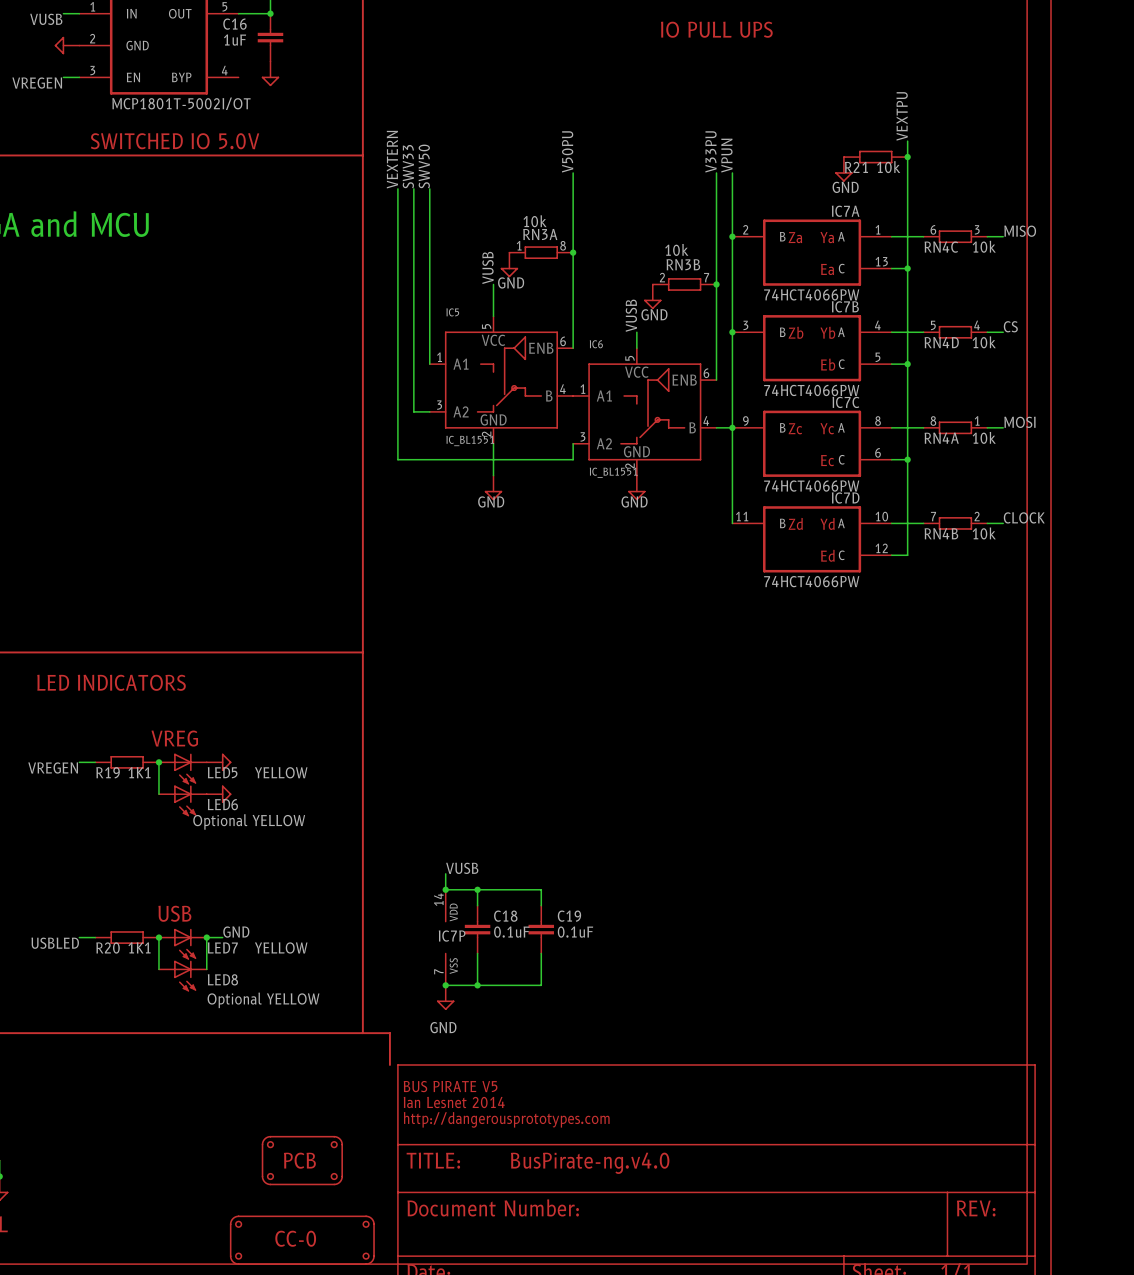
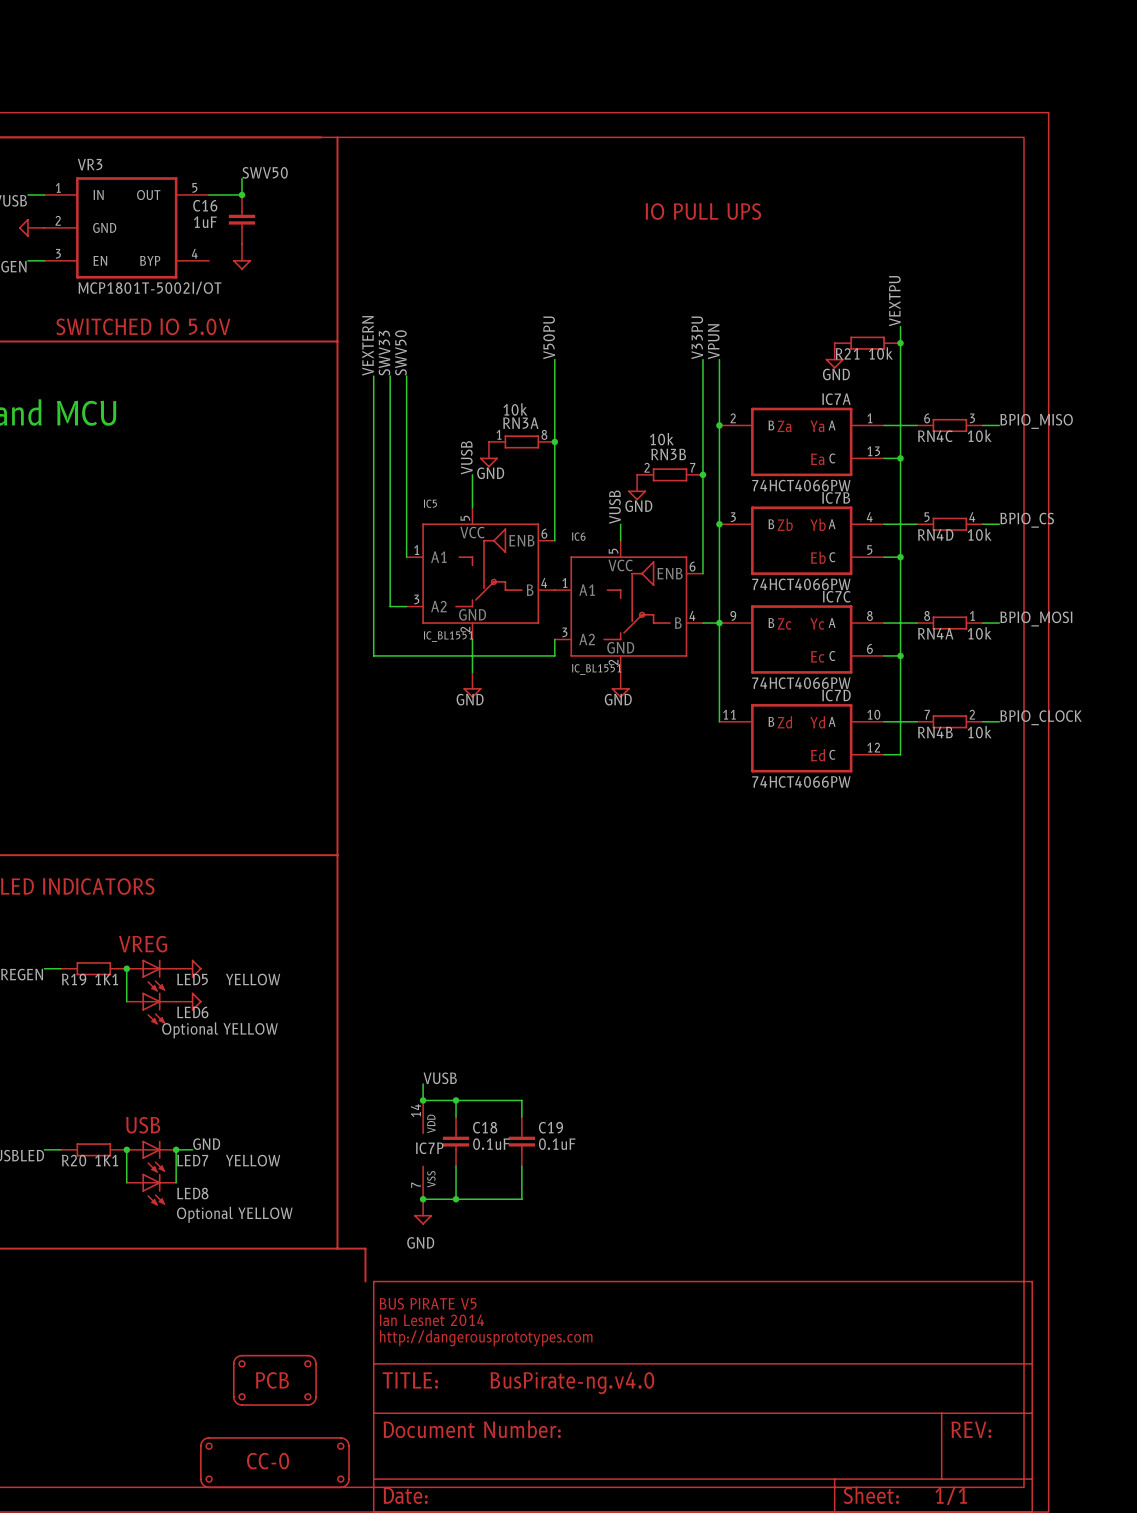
label: MISO (1020, 231) -> BPIO_MISO (1036, 421)
label: CS (1010, 326) -> BPIO_CS (1027, 520)
label: MOSI (1019, 422) -> BPIO_MOSI (1036, 618)
label: CLOCK (1024, 517) -> BPIO_CLOCK (1041, 717)

